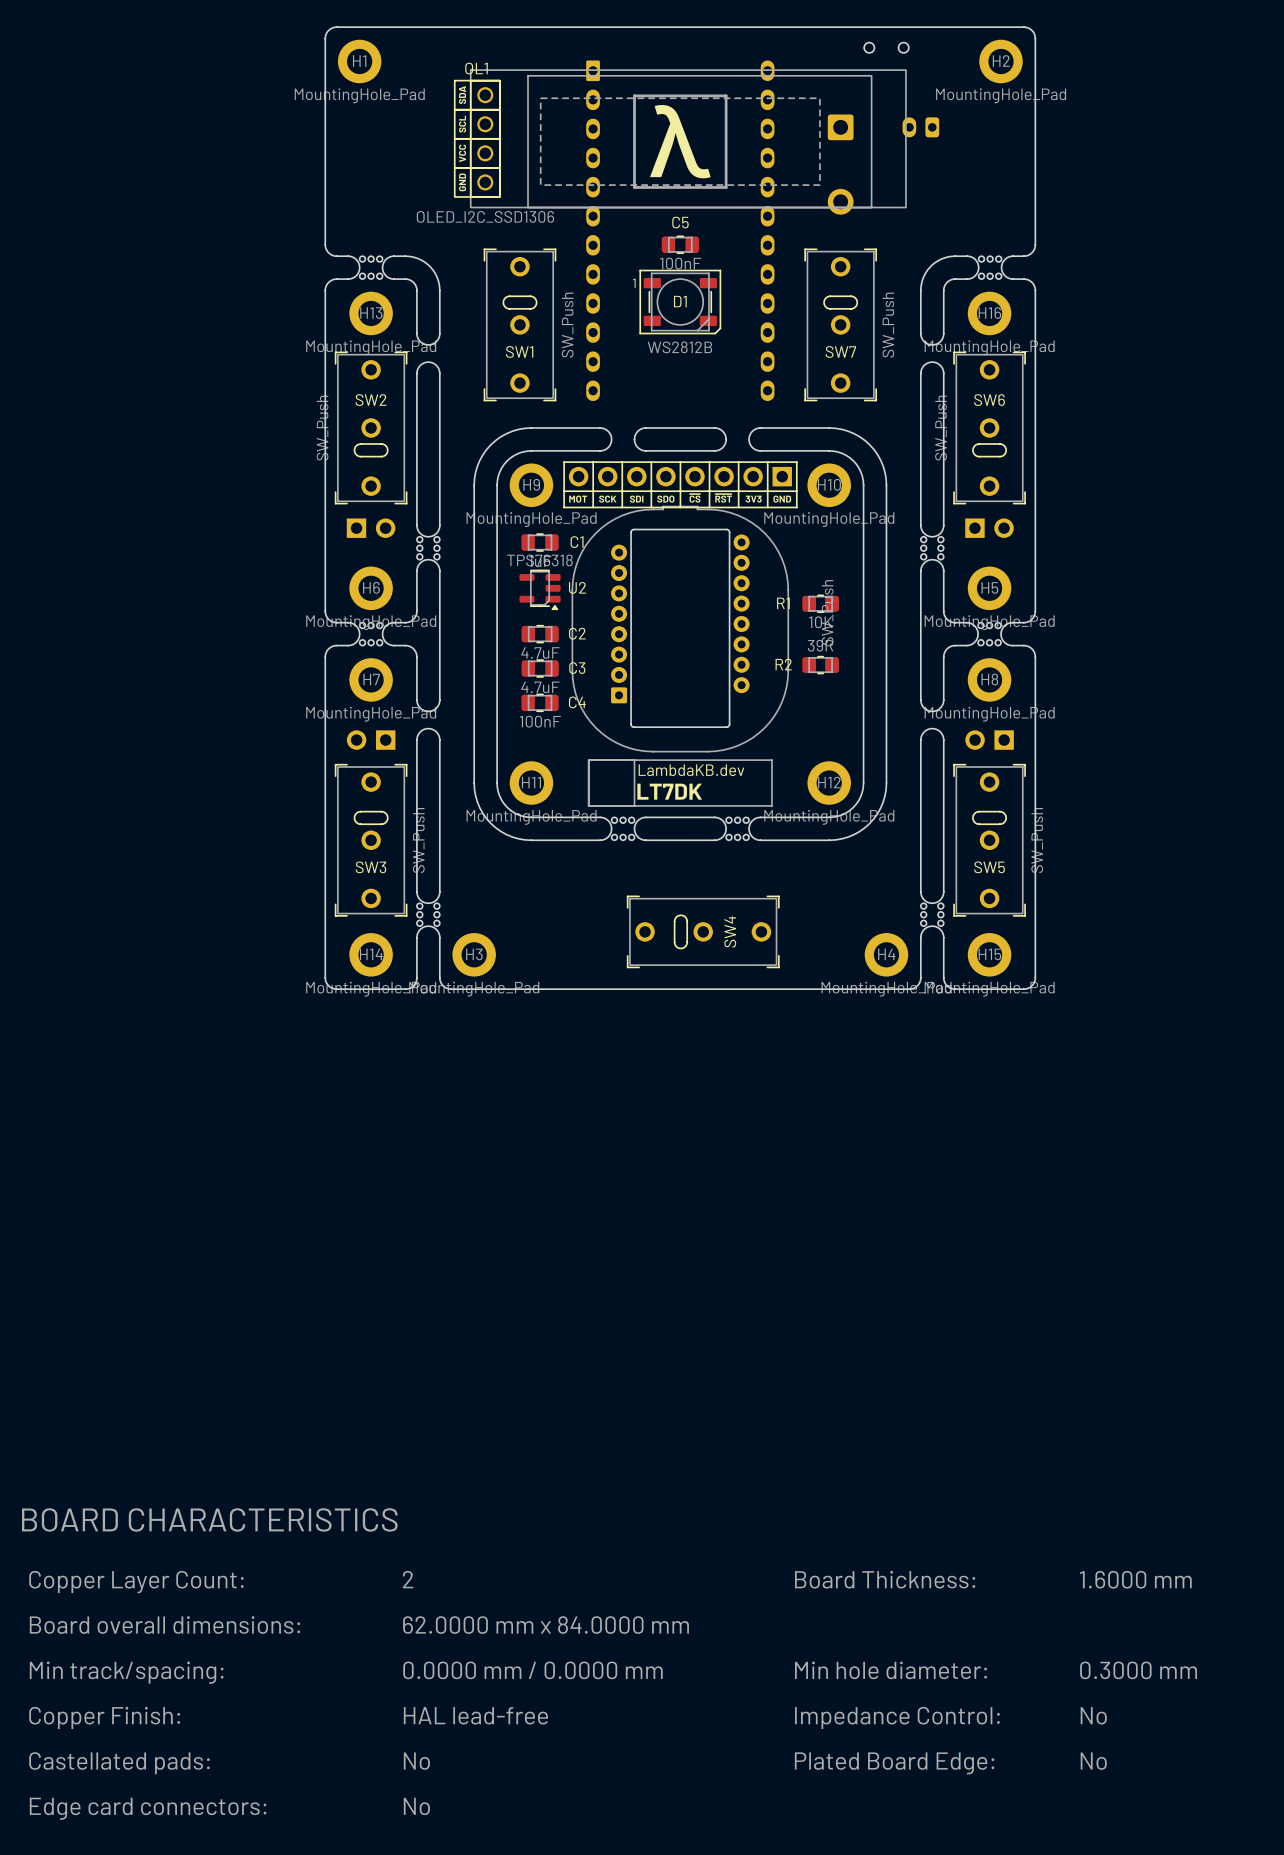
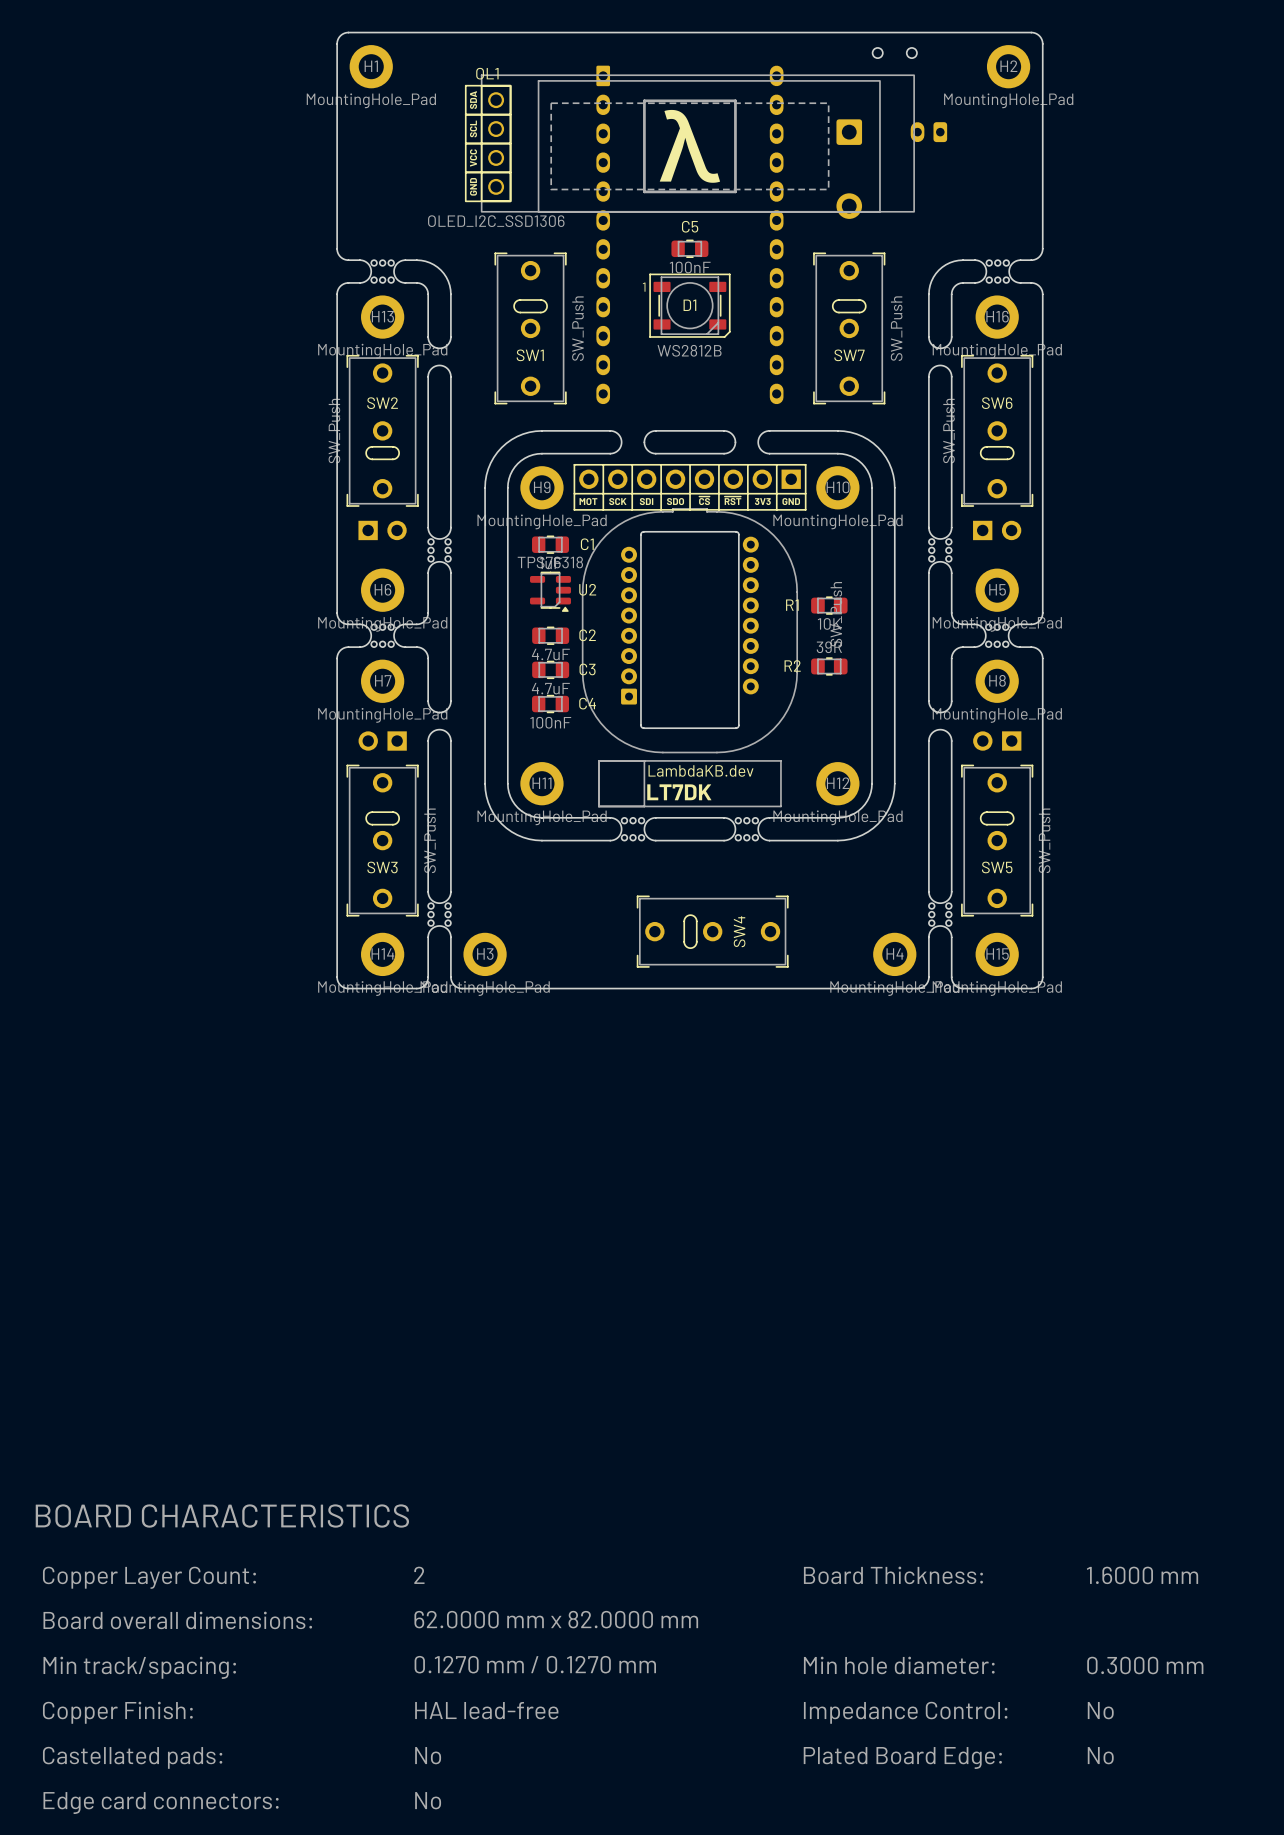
text: 62.0000 mm x 84.0000 mm (546, 1625) -> 62.0000 mm x 82.0000 mm (556, 1619)
text: 0.0000 mm / 0.0000 mm (532, 1670) -> 0.1270 mm / 0.1270 mm (535, 1664)

